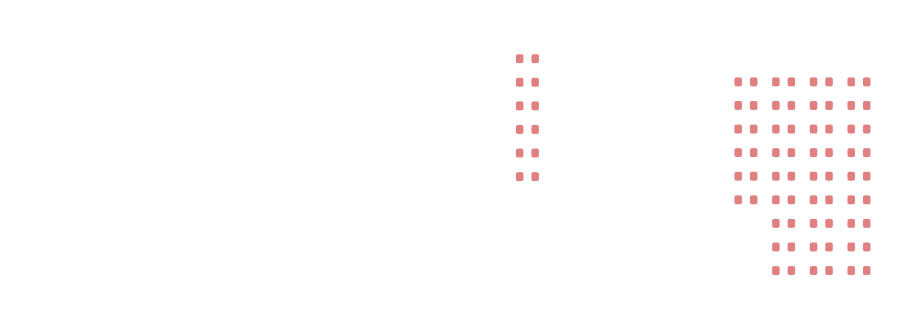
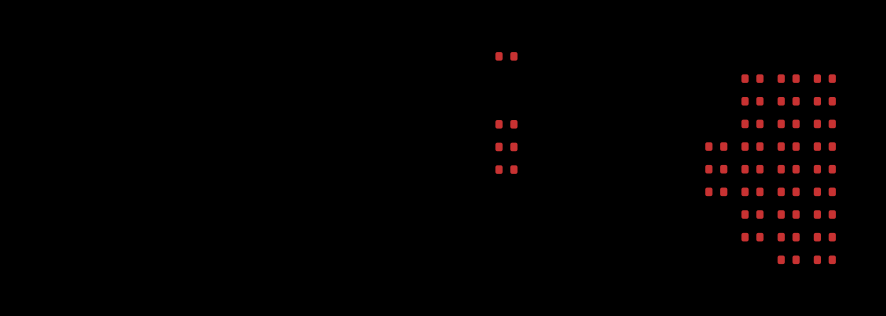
part: (745, 81) -> none
part: (527, 82) -> none
part: (527, 105) -> none
part: (745, 105) -> none
part: (745, 129) -> none
part: (783, 270) -> none

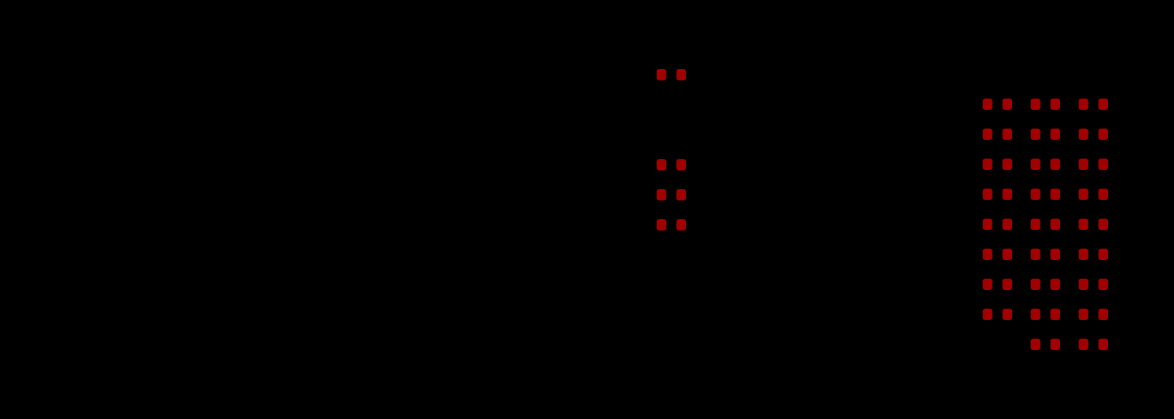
part: (716, 146) -> none
part: (716, 169) -> none
part: (716, 191) -> none

